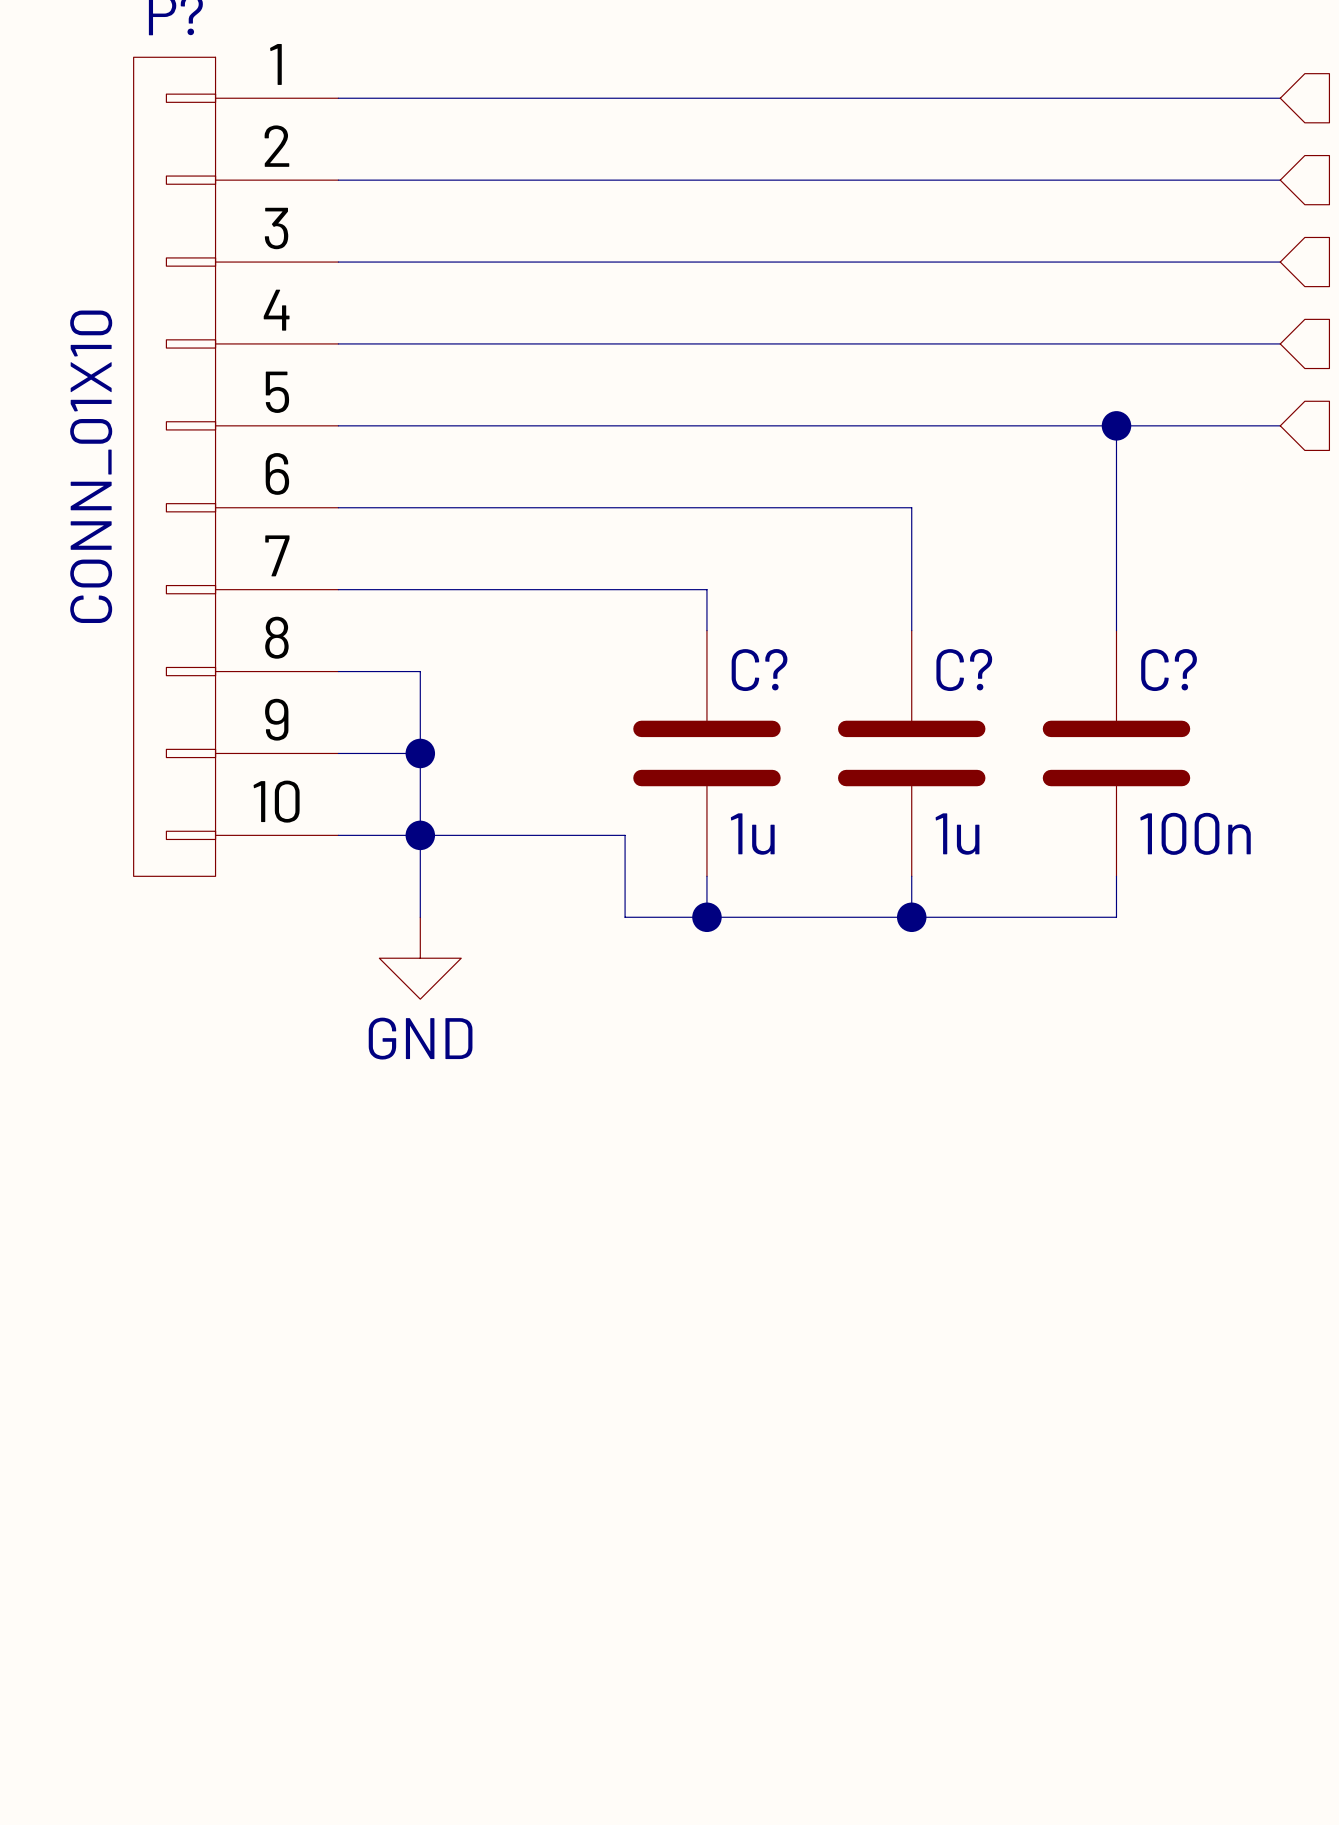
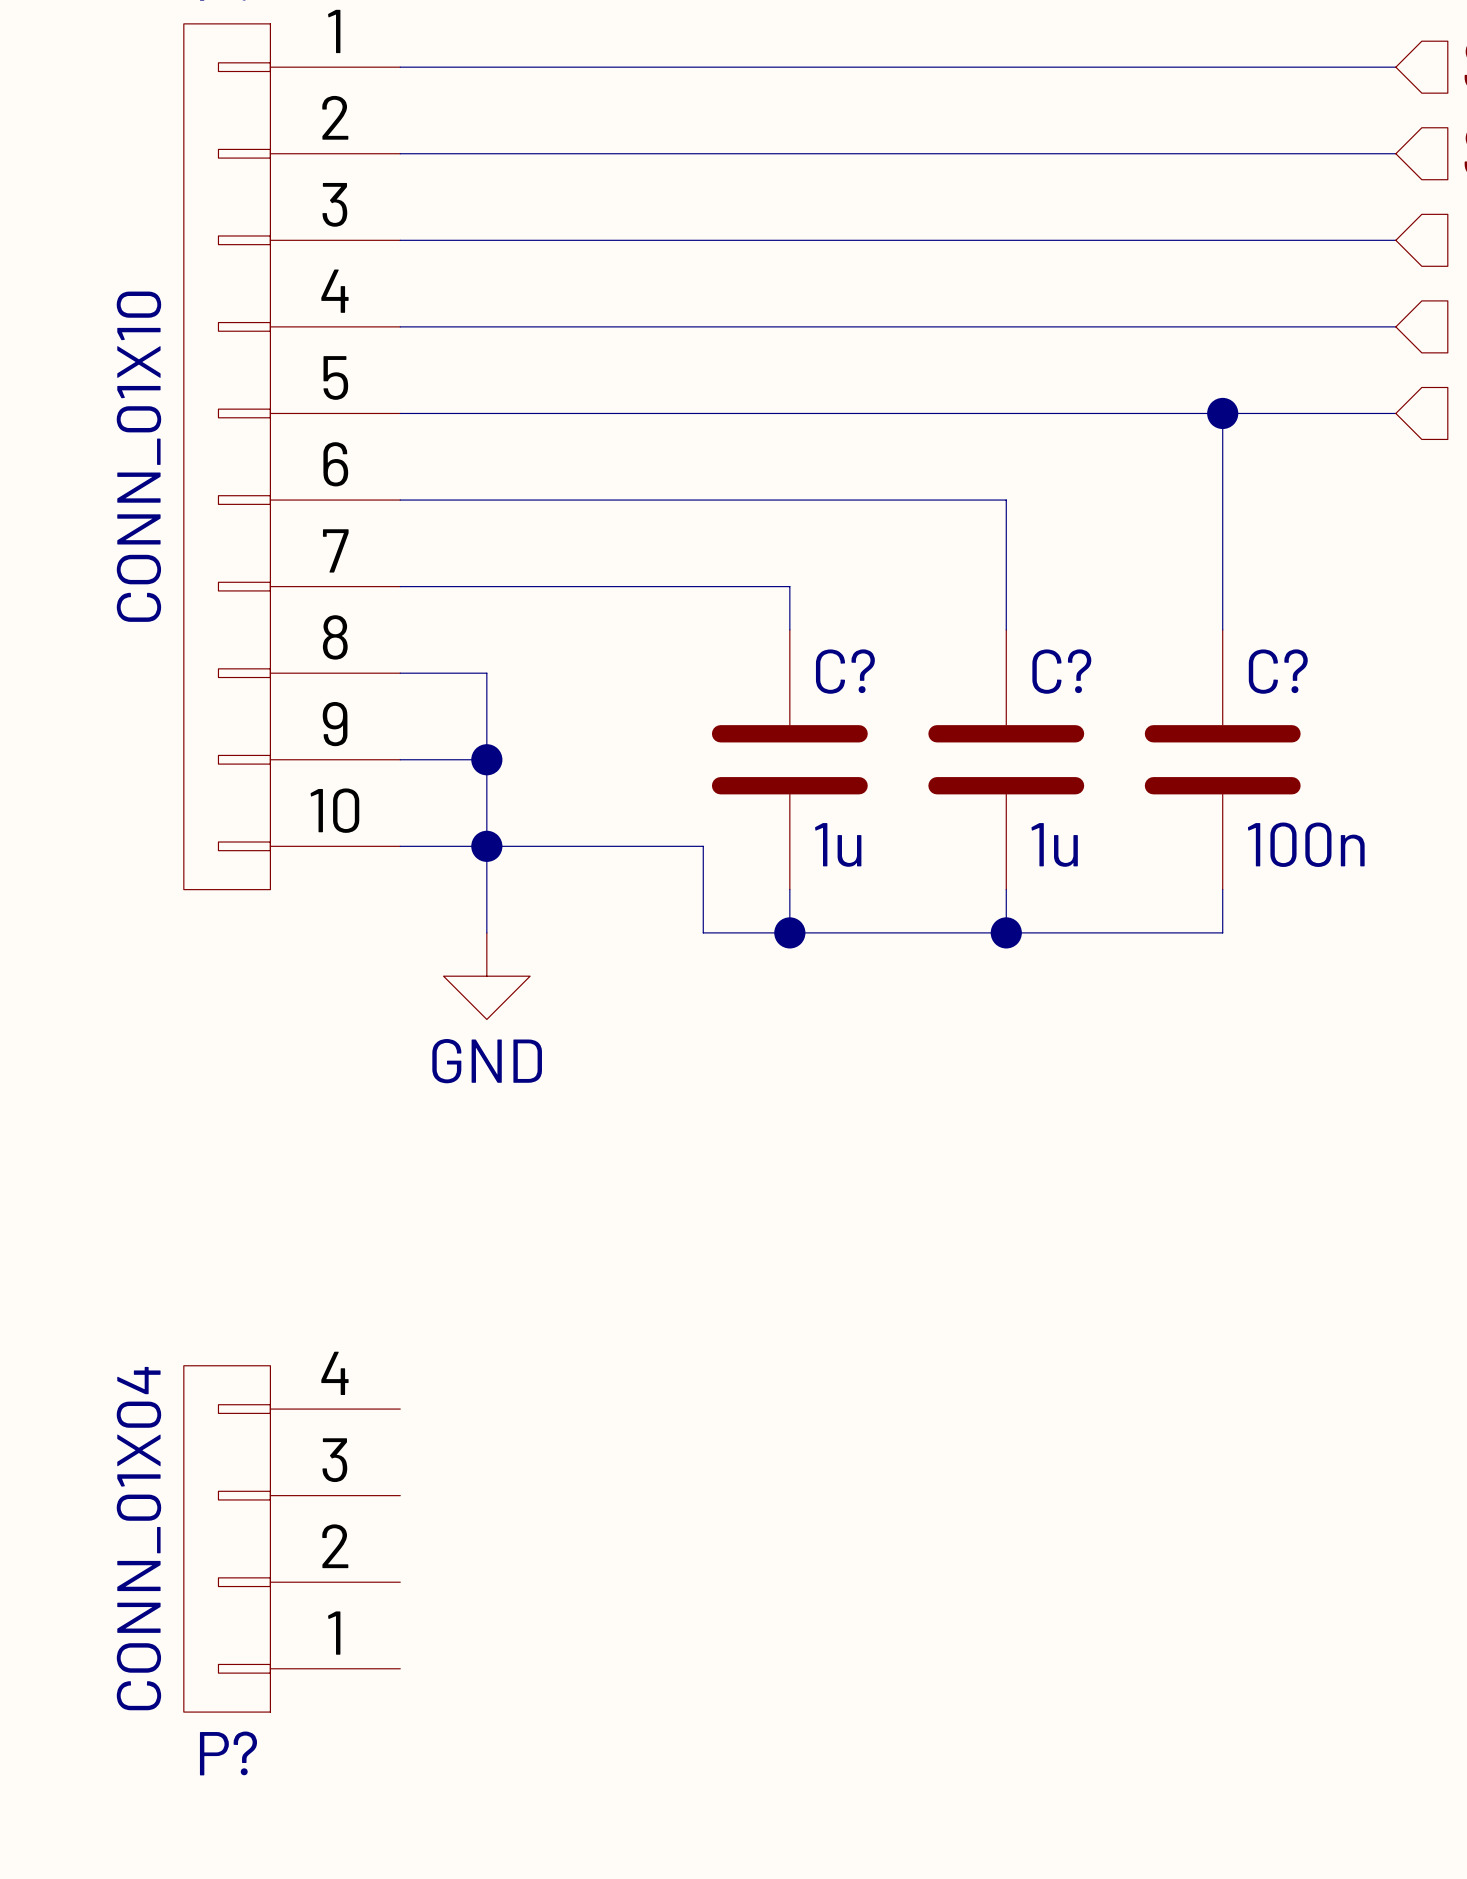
P?: none -> CONN_01X04 (292, 1538)

